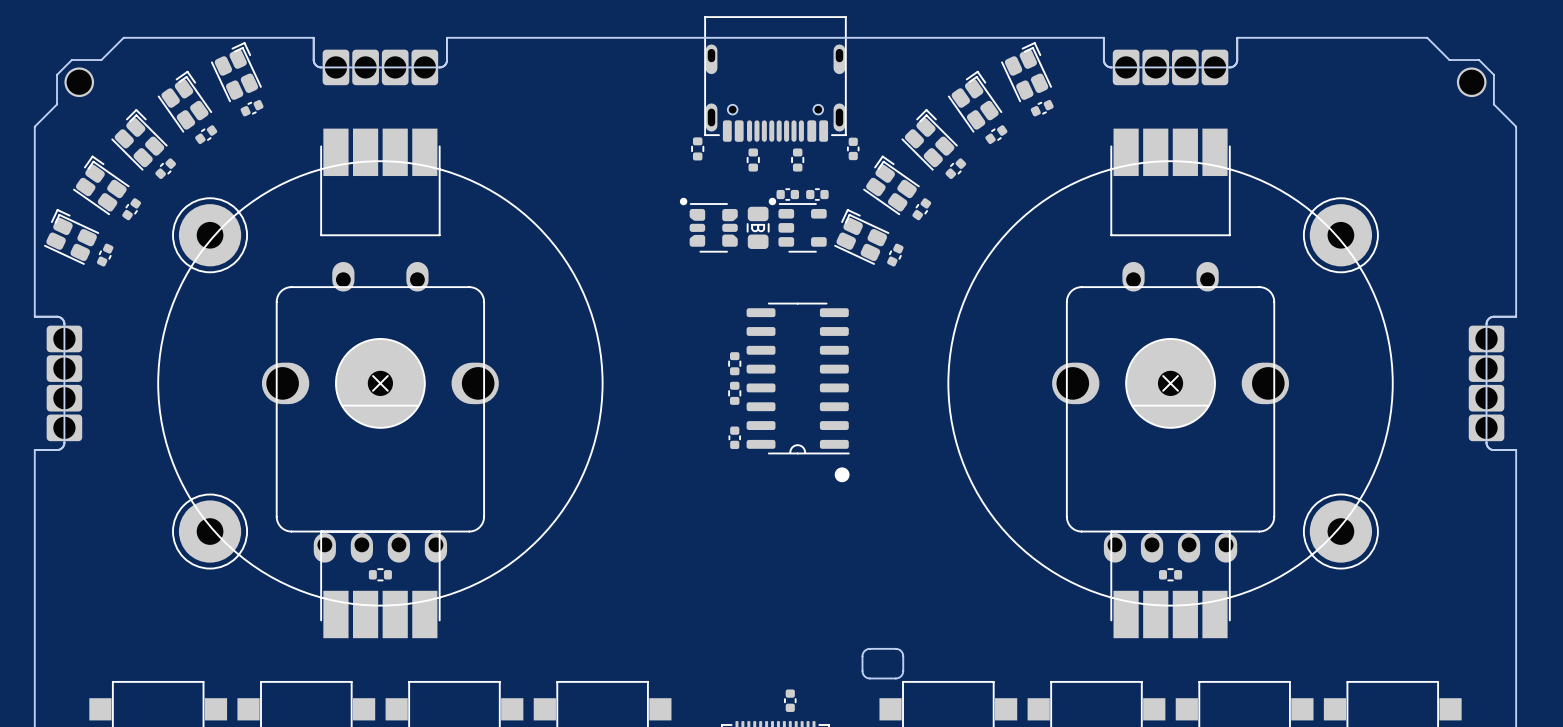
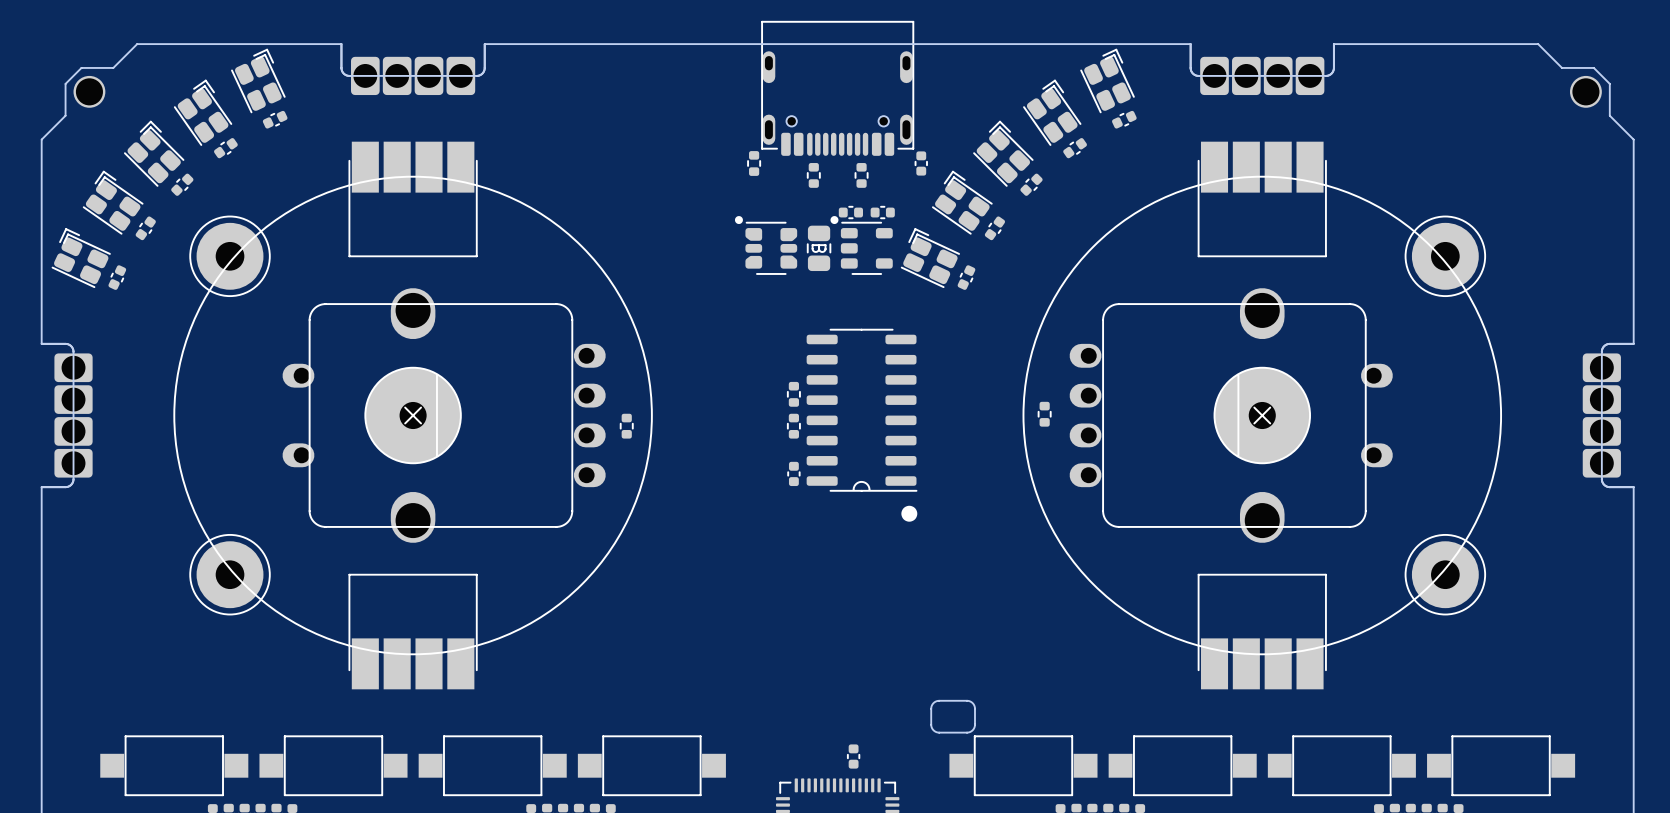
part rotation: 0° (380, 412) -> 90° counterclockwise (444, 415)
part rotation: 0° (1170, 412) -> 90° clockwise (1231, 415)
part rotation: 0° (380, 574) -> 90° clockwise (626, 426)
part position: (380, 574) -> (626, 426)
part rotation: 0° (1170, 574) -> 90° clockwise (1044, 414)
part position: (1170, 574) -> (1044, 414)

